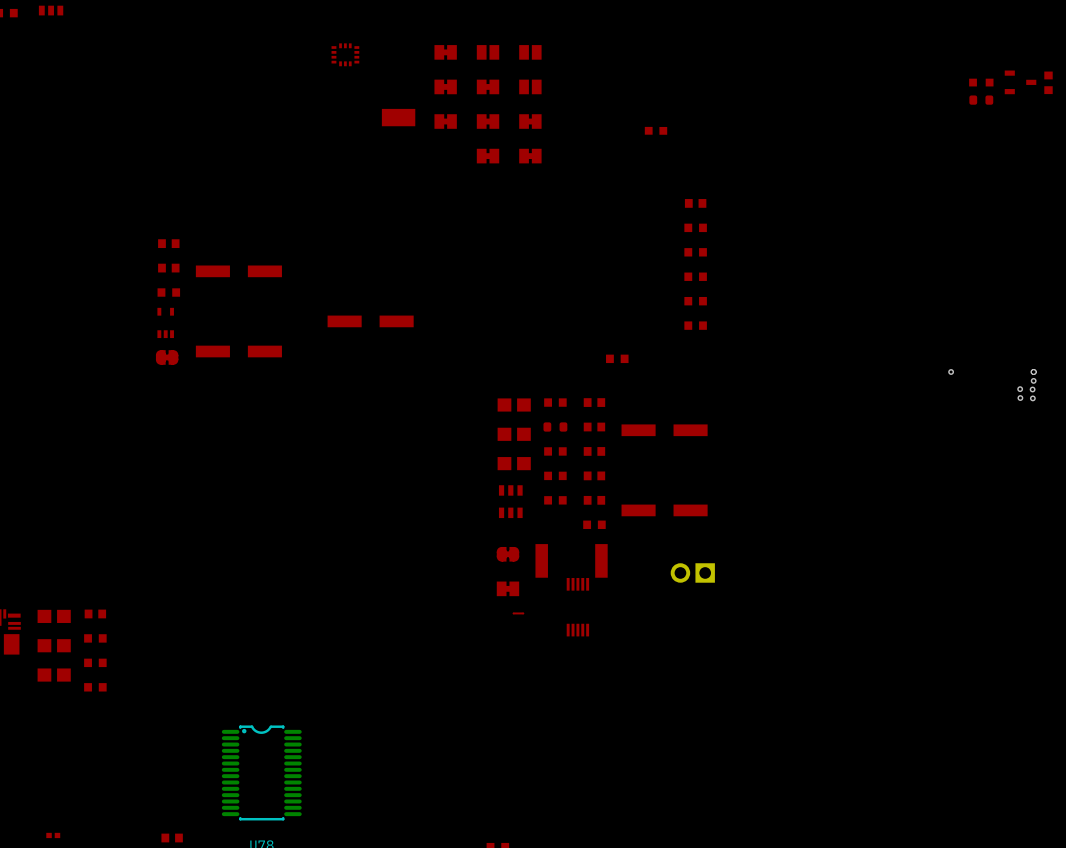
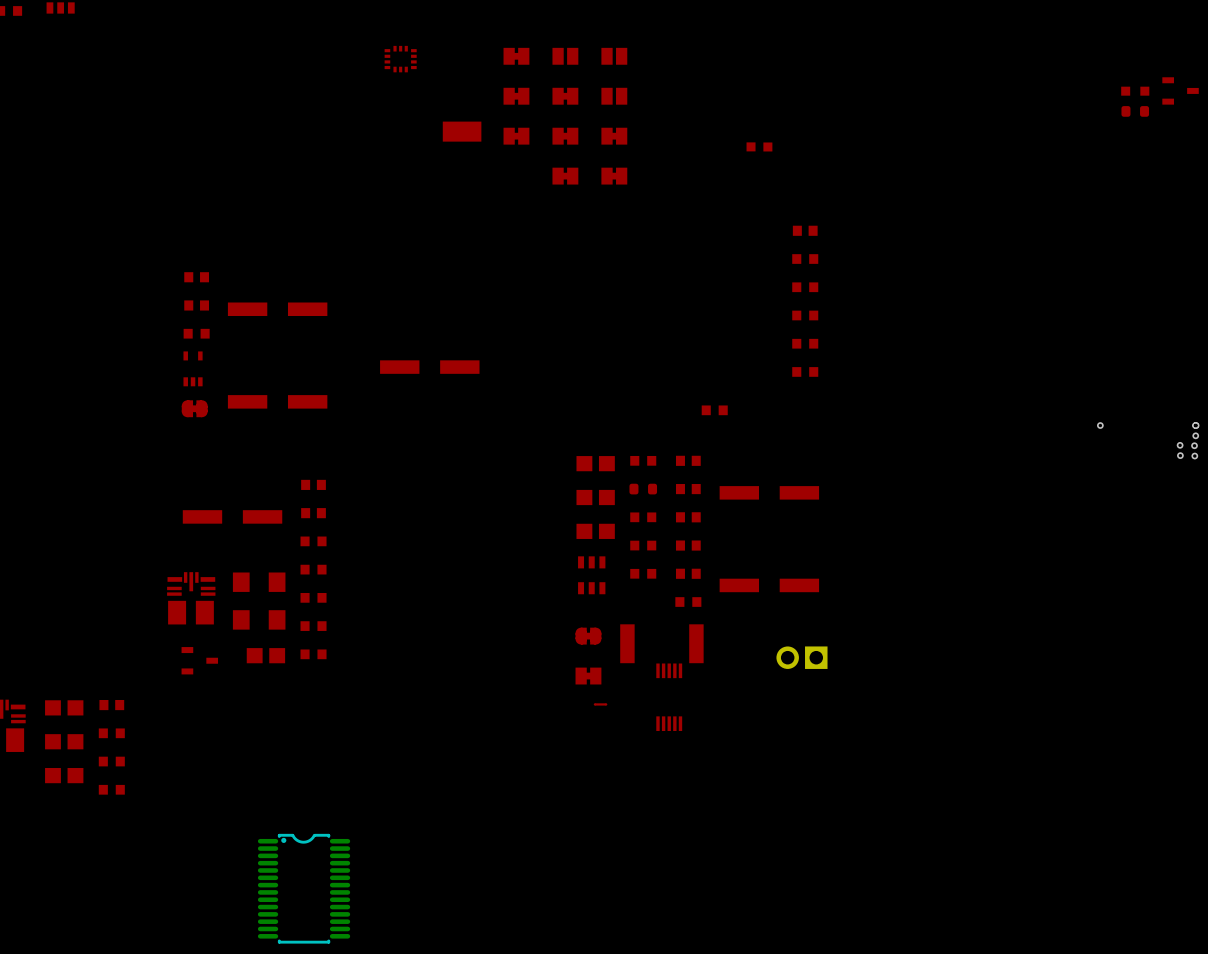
part: none -> (313, 484)
part: none -> (313, 513)
part: none -> (232, 516)
part: none -> (313, 541)
part: none -> (313, 569)
part: none -> (259, 582)
part: none -> (191, 598)
part: none -> (313, 597)
part: none -> (259, 619)
part: none -> (313, 626)
part: none -> (313, 654)
part: none -> (265, 655)
part: none -> (199, 660)

